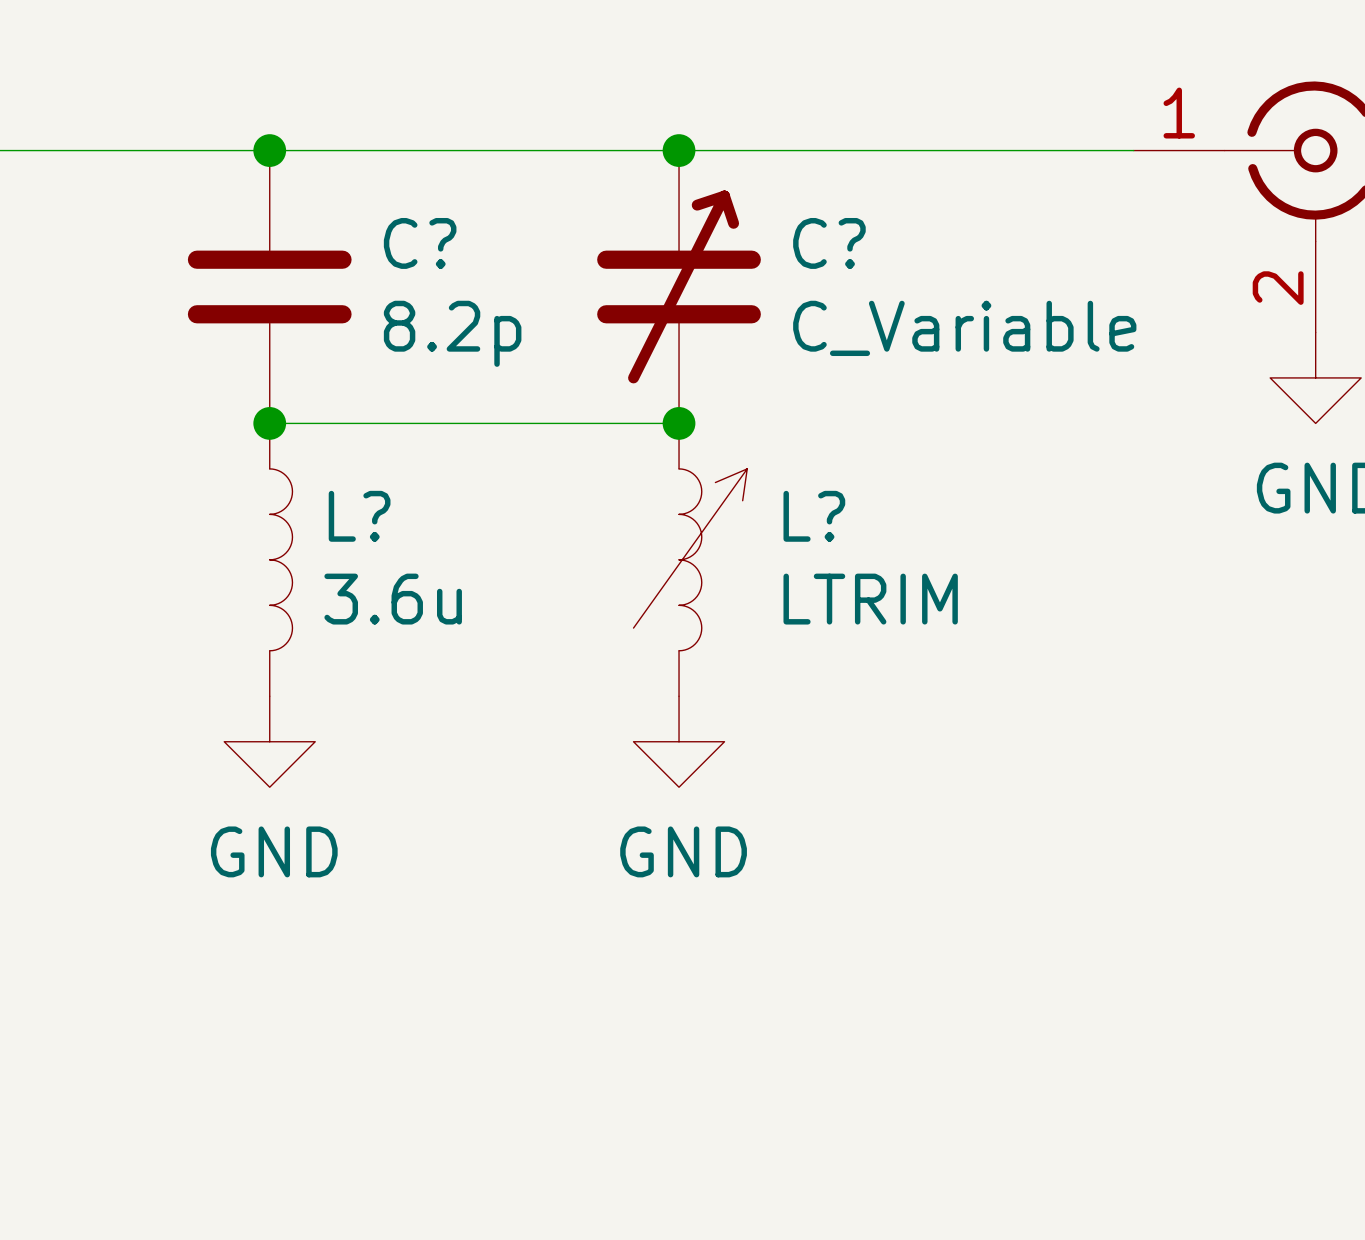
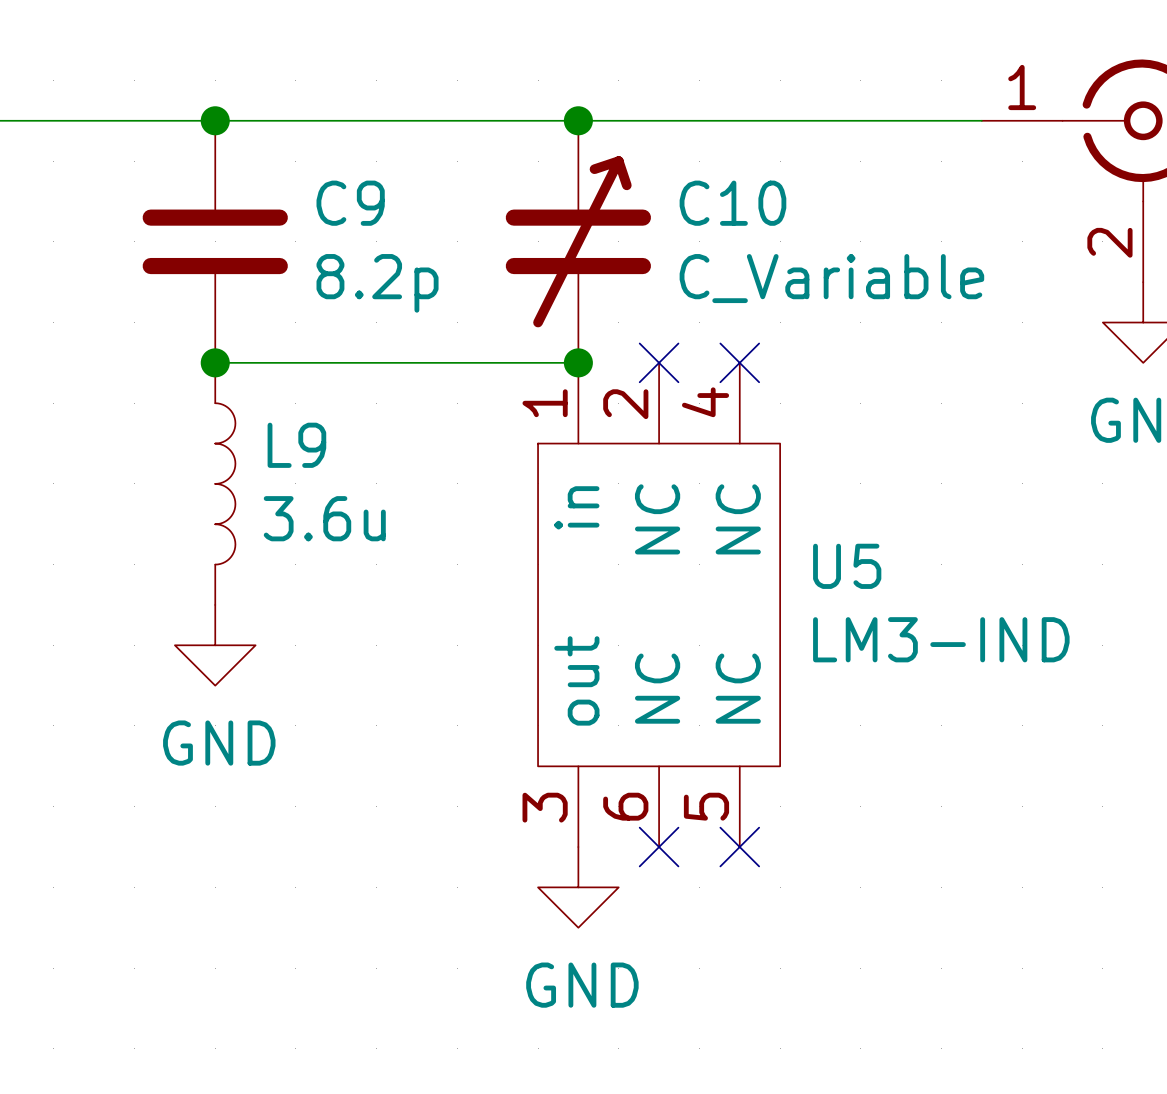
C? name: C? (420, 243) -> C9 (350, 203)
C? name: C? (829, 243) -> C10 (732, 203)
no-connect mark: none -> (659, 362)
no-connect mark: none -> (739, 362)
L? name: L? (359, 516) -> L9 (296, 445)
L?: LTRIM (690, 559) -> none
U5: none -> LM3-IND (659, 604)
power symbol position: GND (679, 741) -> GND (578, 887)
no-connect mark: none -> (659, 847)
no-connect mark: none -> (739, 847)

